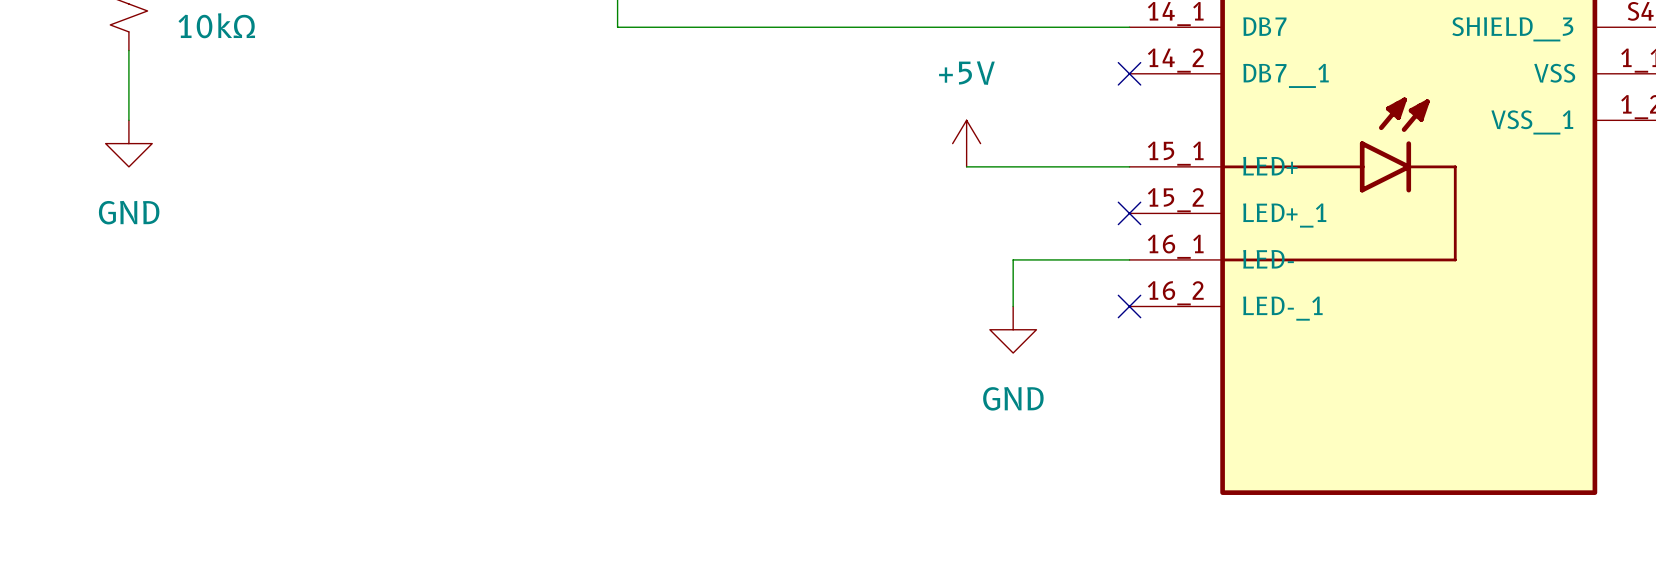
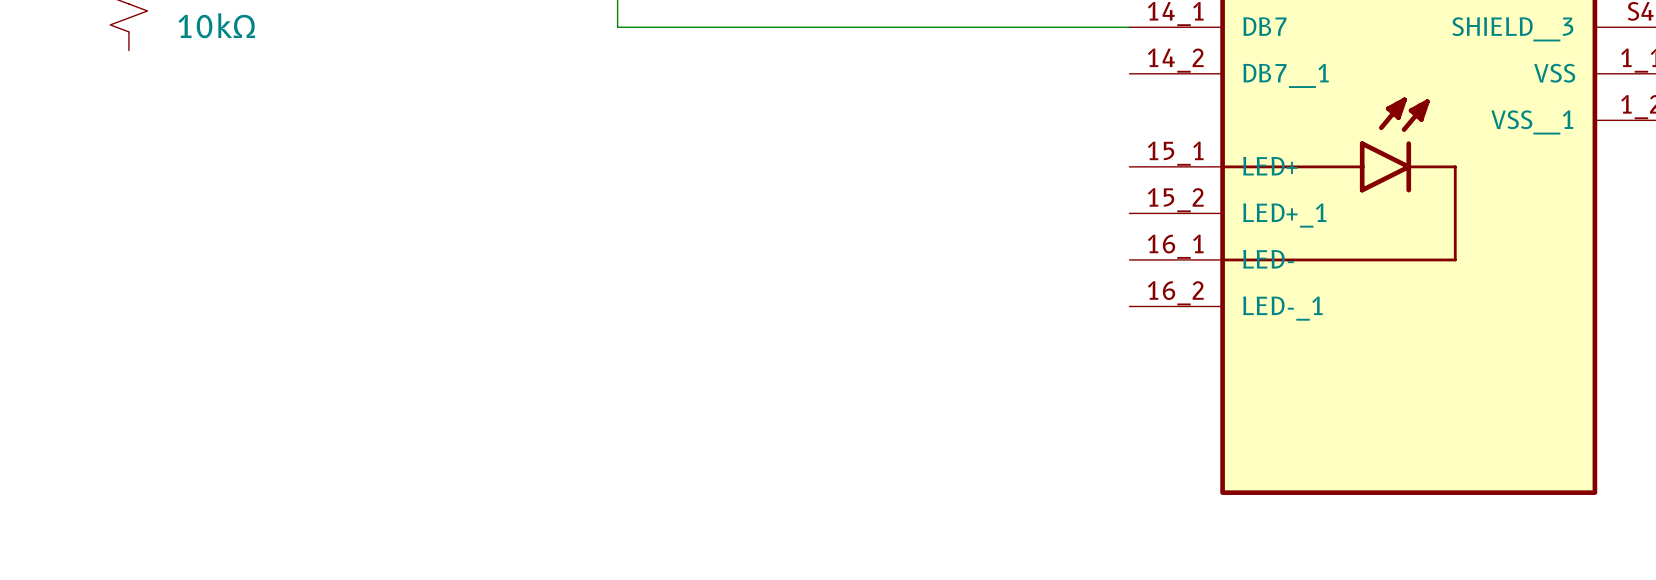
wire: (128, 50) (128, 120) -> none
no-connect mark: (1129, 73) -> none
power symbol: GND (128, 143) -> none
power symbol: +5V (966, 143) -> none
wire: (966, 166) (1129, 166) -> none
no-connect mark: (1129, 213) -> none
wire: (1129, 259) (1013, 259) (1013, 306) -> none
no-connect mark: (1129, 306) -> none
power symbol: GND (1013, 329) -> none

